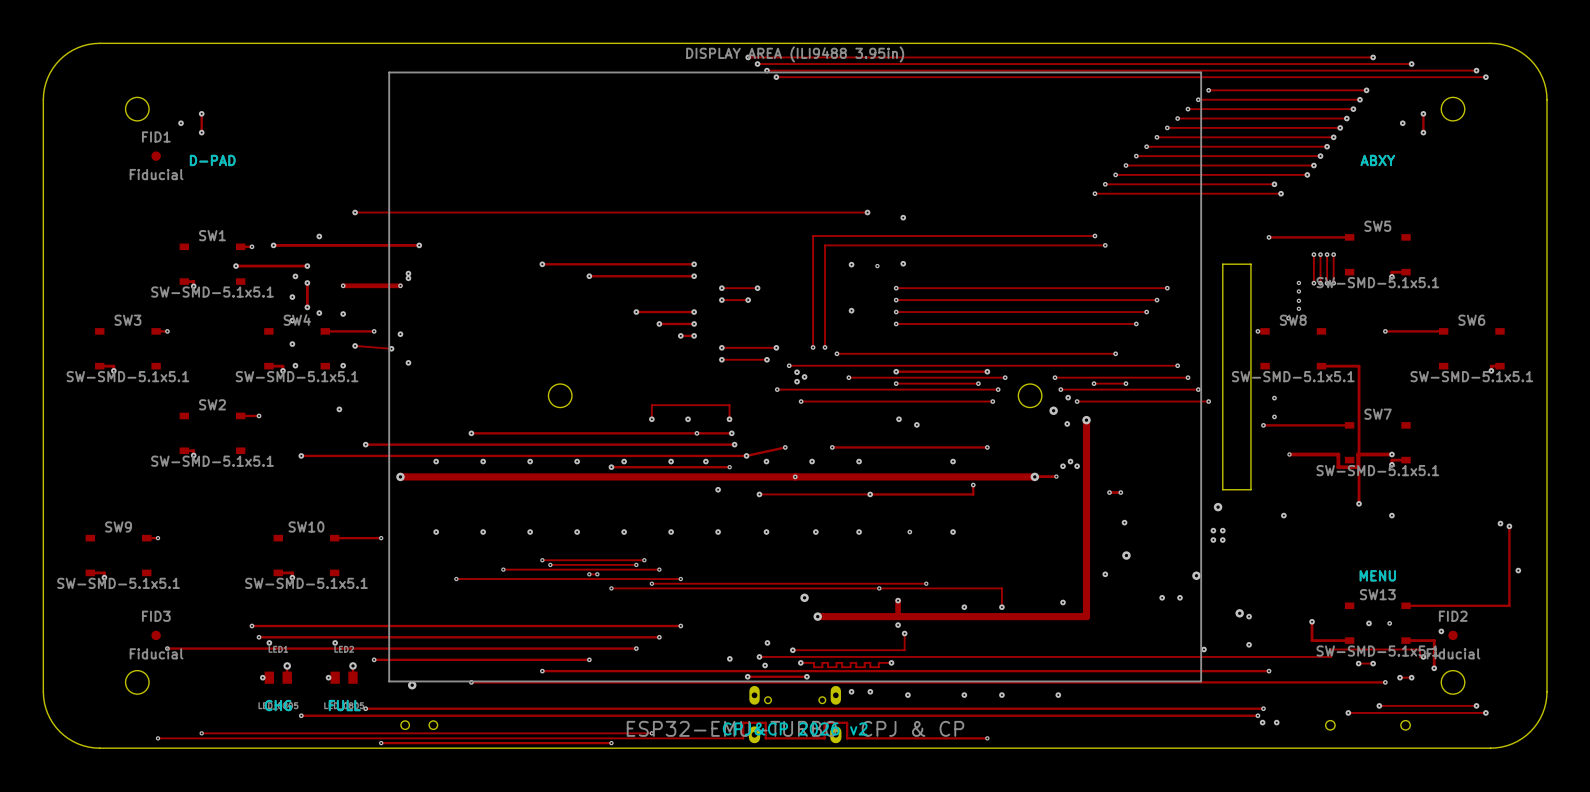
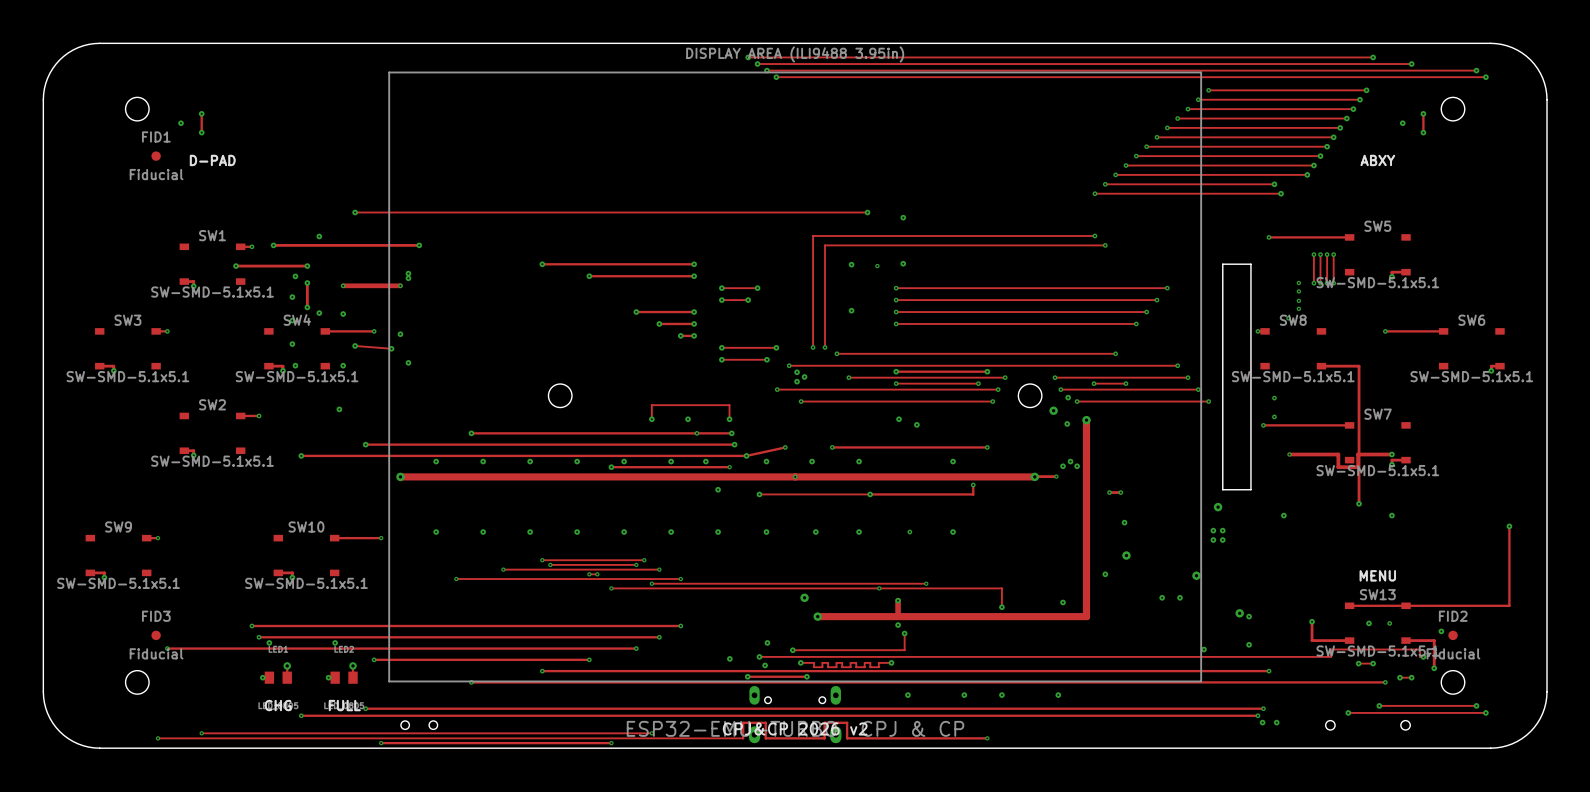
via: (1500, 523) -> none
via: (1518, 570) -> none
track: none -> (1349, 605) (1406, 605)
via: (964, 607) -> none
via: (412, 685) -> none
via: (851, 691) -> none
via: (870, 691) -> none

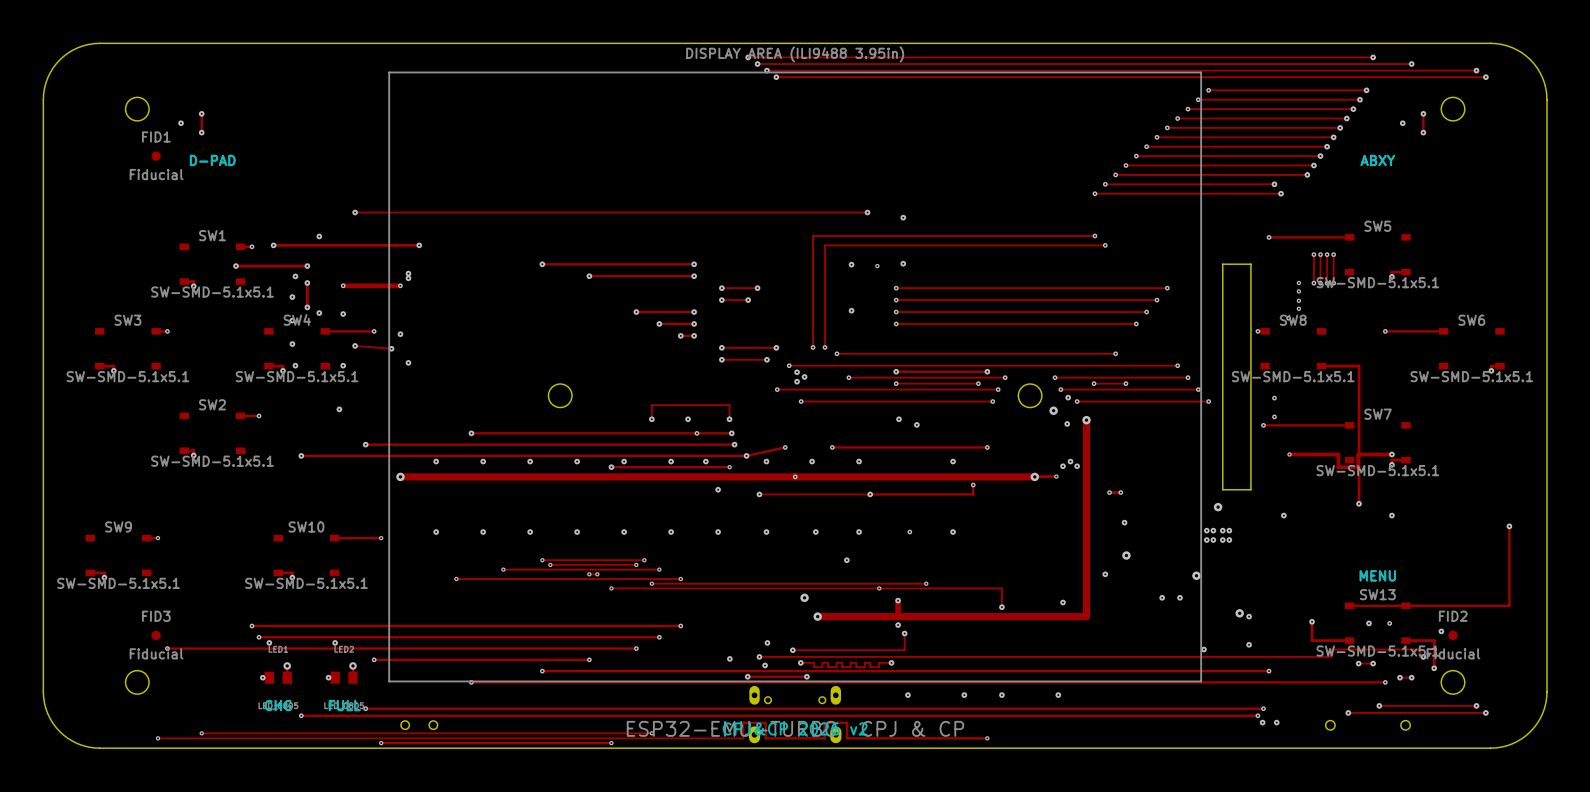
via: none -> (1206, 530)
via: none -> (1229, 530)
via: none -> (1206, 540)
via: none -> (1229, 540)
via: none -> (846, 560)

